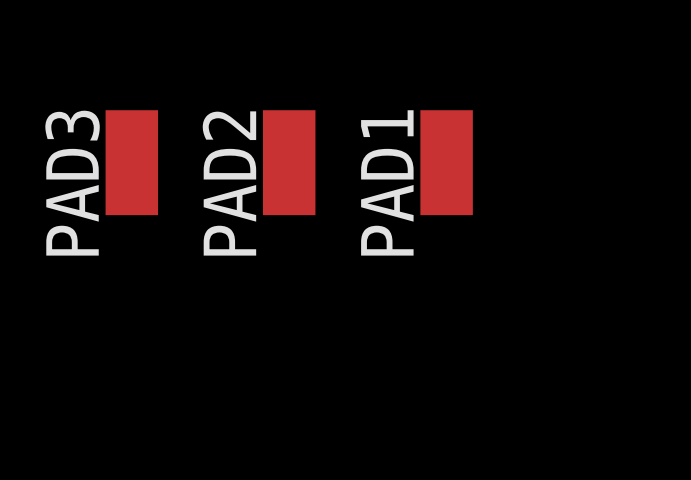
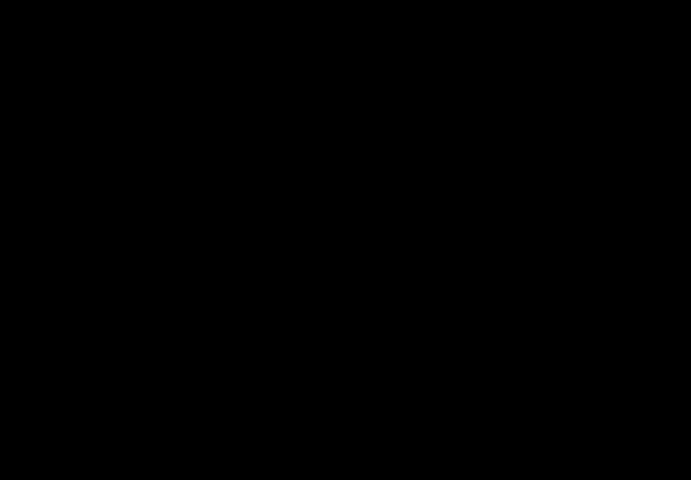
PAD3: (131, 162) -> none
PAD2: (289, 162) -> none
PAD1: (446, 162) -> none

